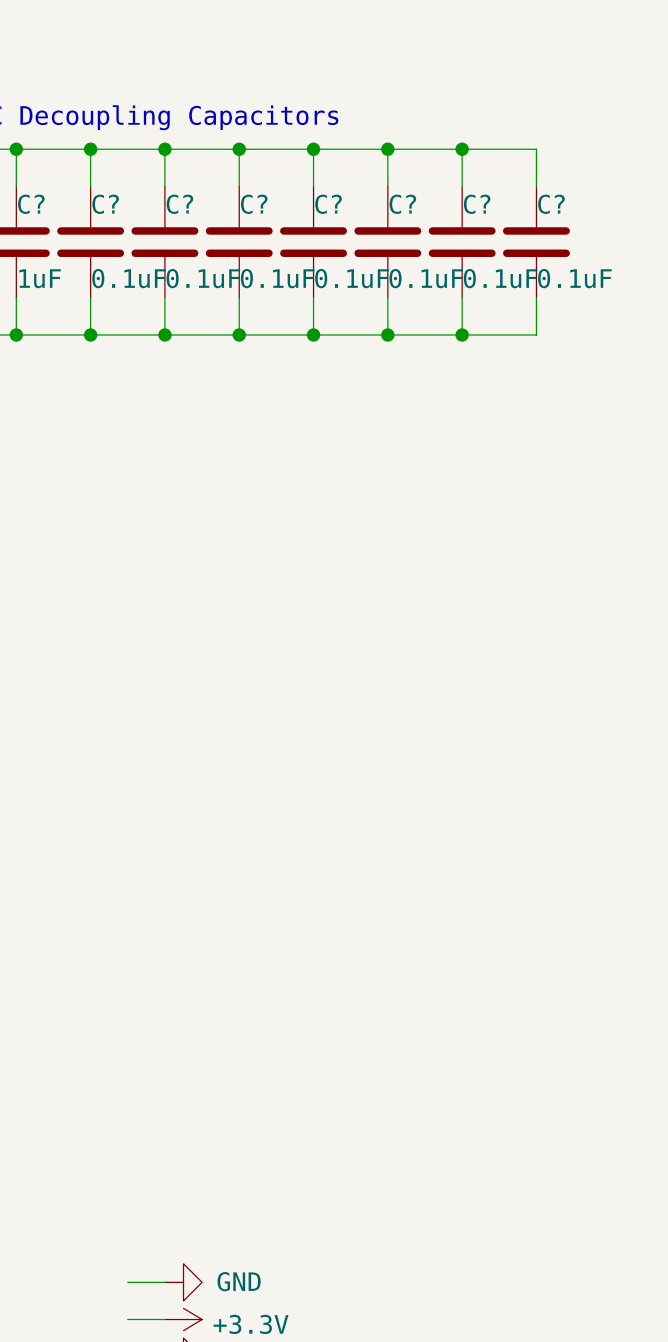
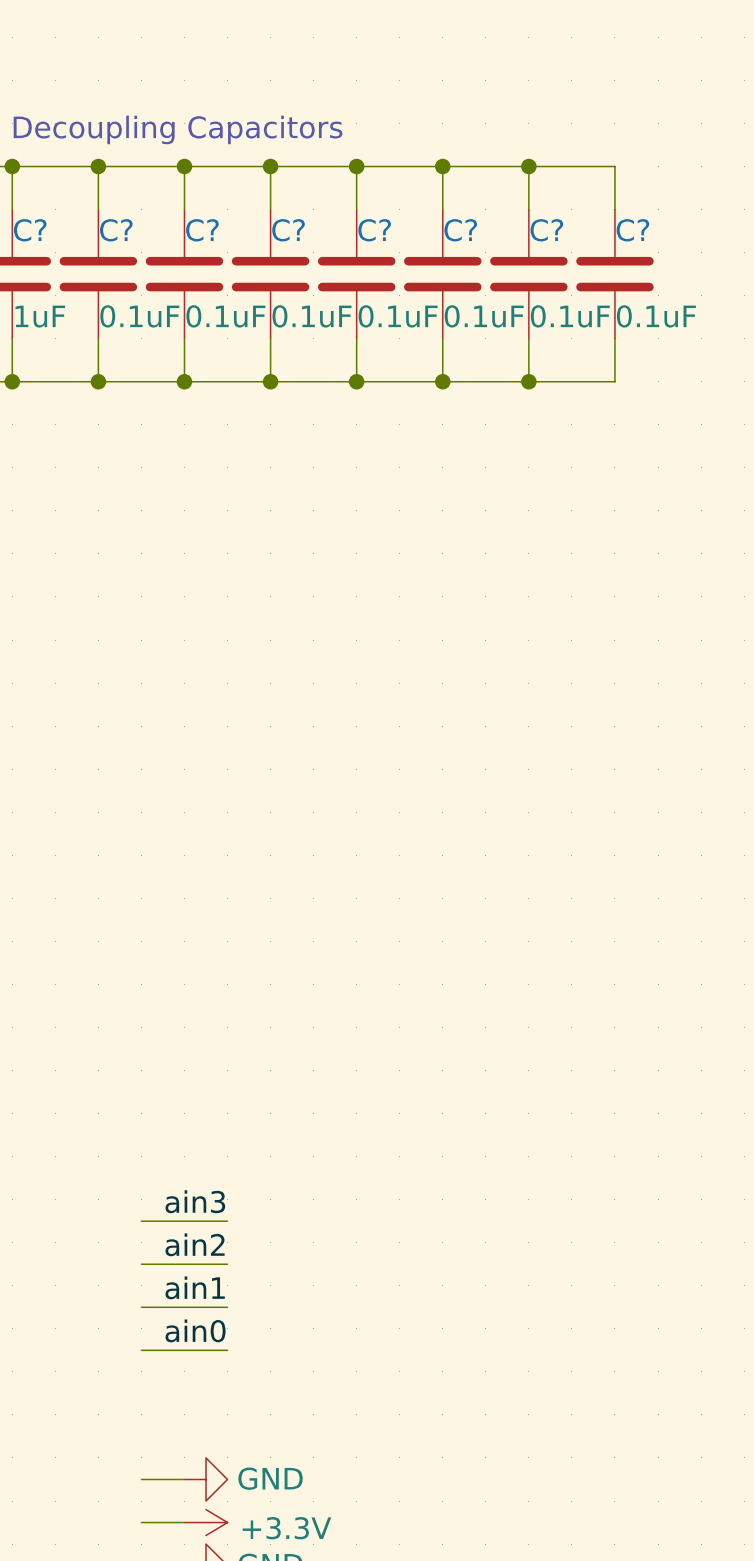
label: none -> ain3 (195, 1201)
wire: none -> (141, 1221) (227, 1221)
label: none -> ain2 (195, 1244)
wire: none -> (141, 1264) (227, 1264)
label: none -> ain1 (195, 1287)
wire: none -> (141, 1307) (227, 1307)
label: none -> ain0 (195, 1330)
wire: none -> (141, 1350) (227, 1350)

